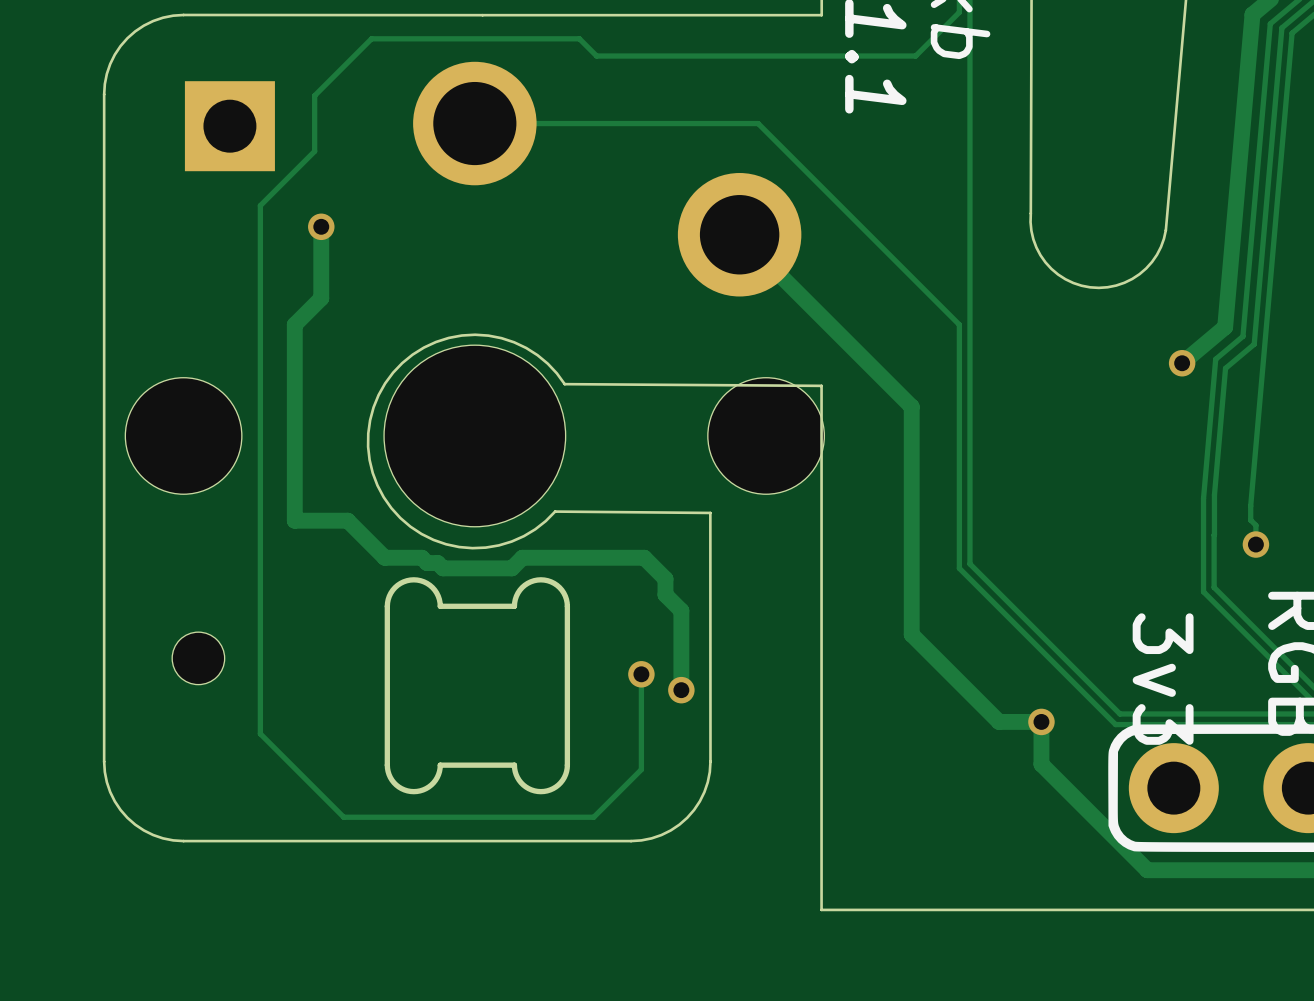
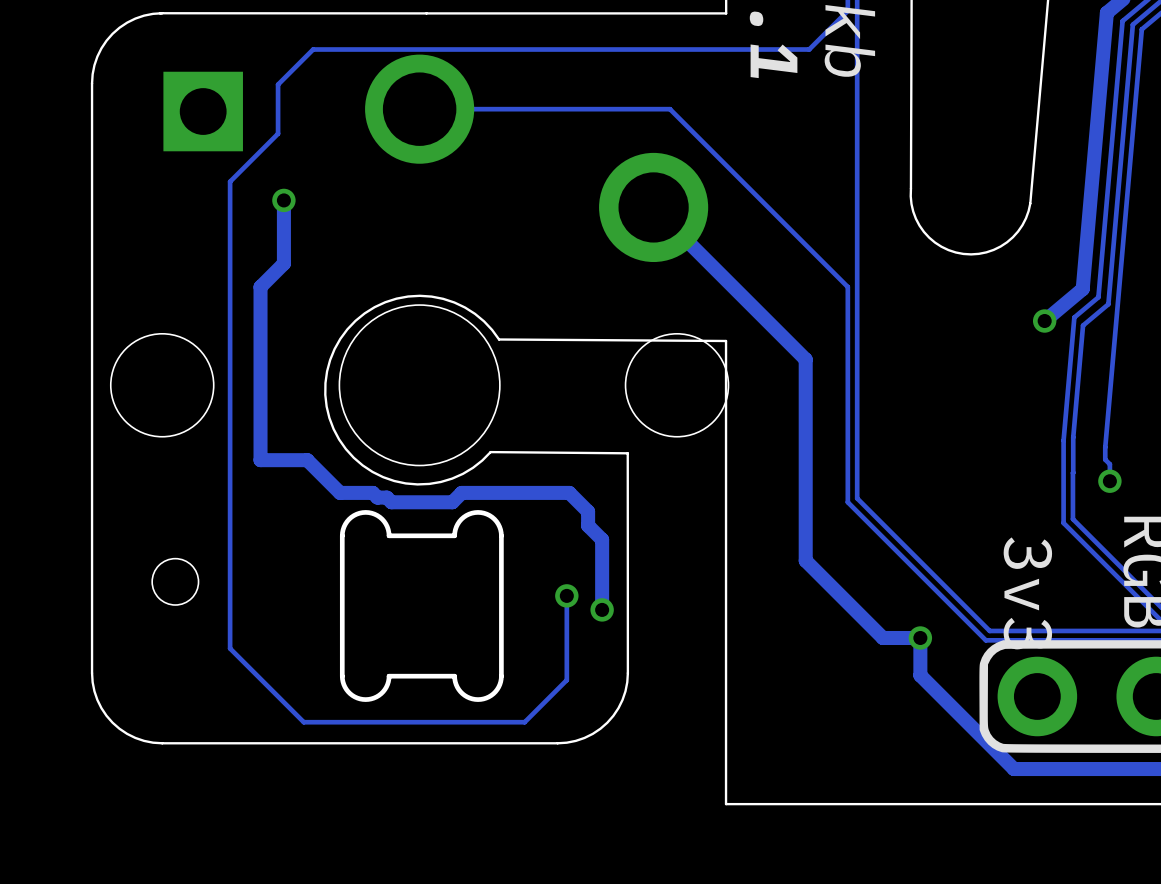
track: (596, 56) (579, 38) (371, 38) (354, 56) -> (527, 49) (313, 49)

